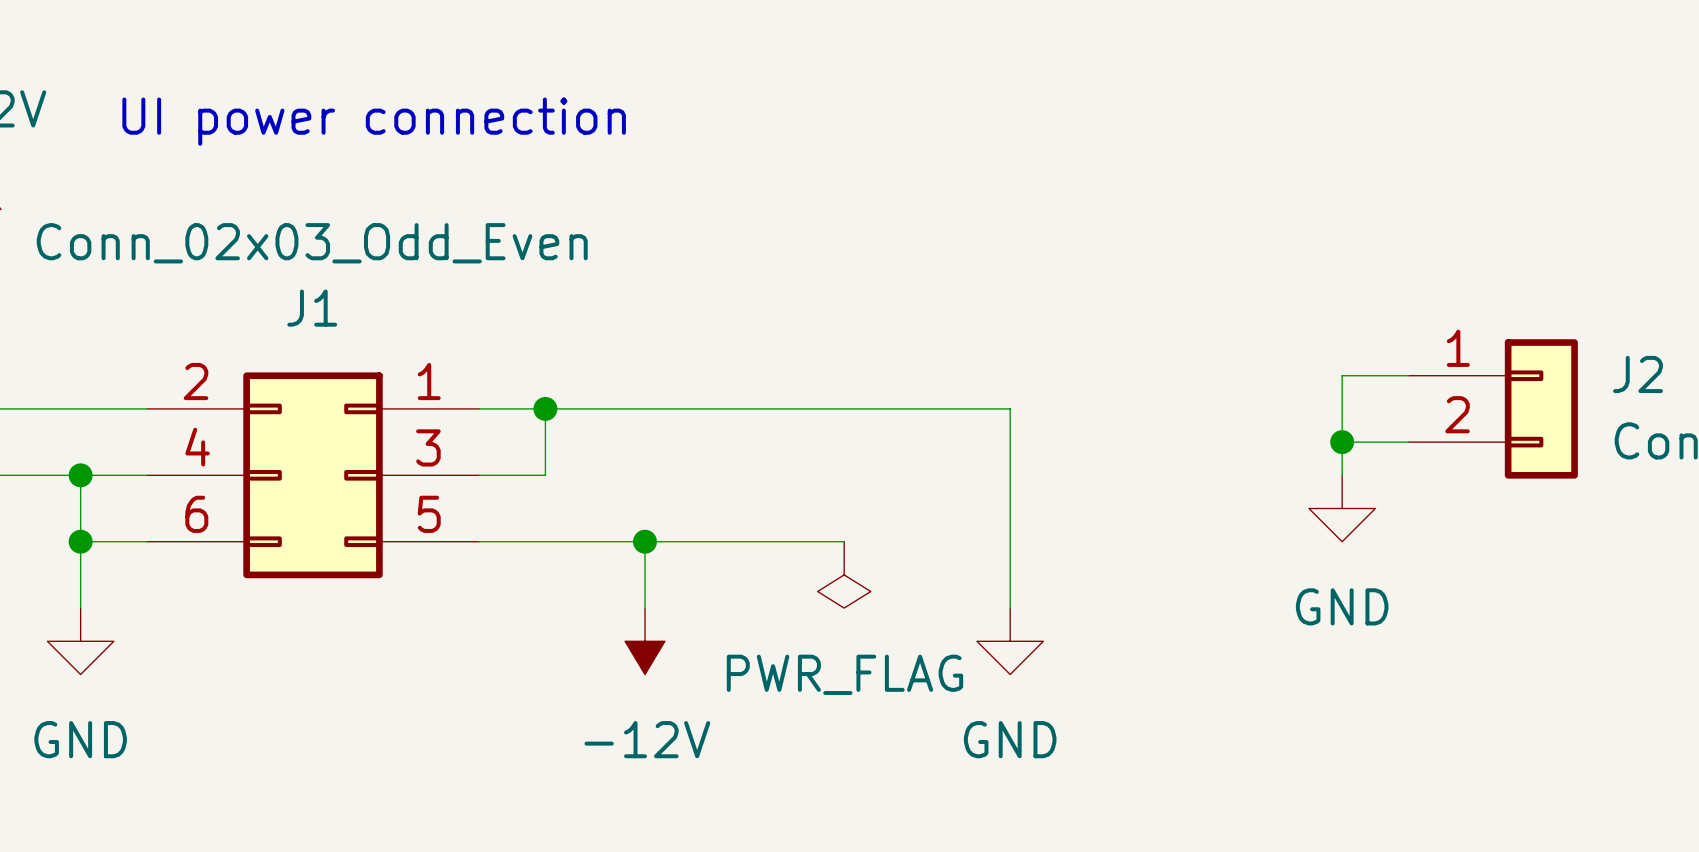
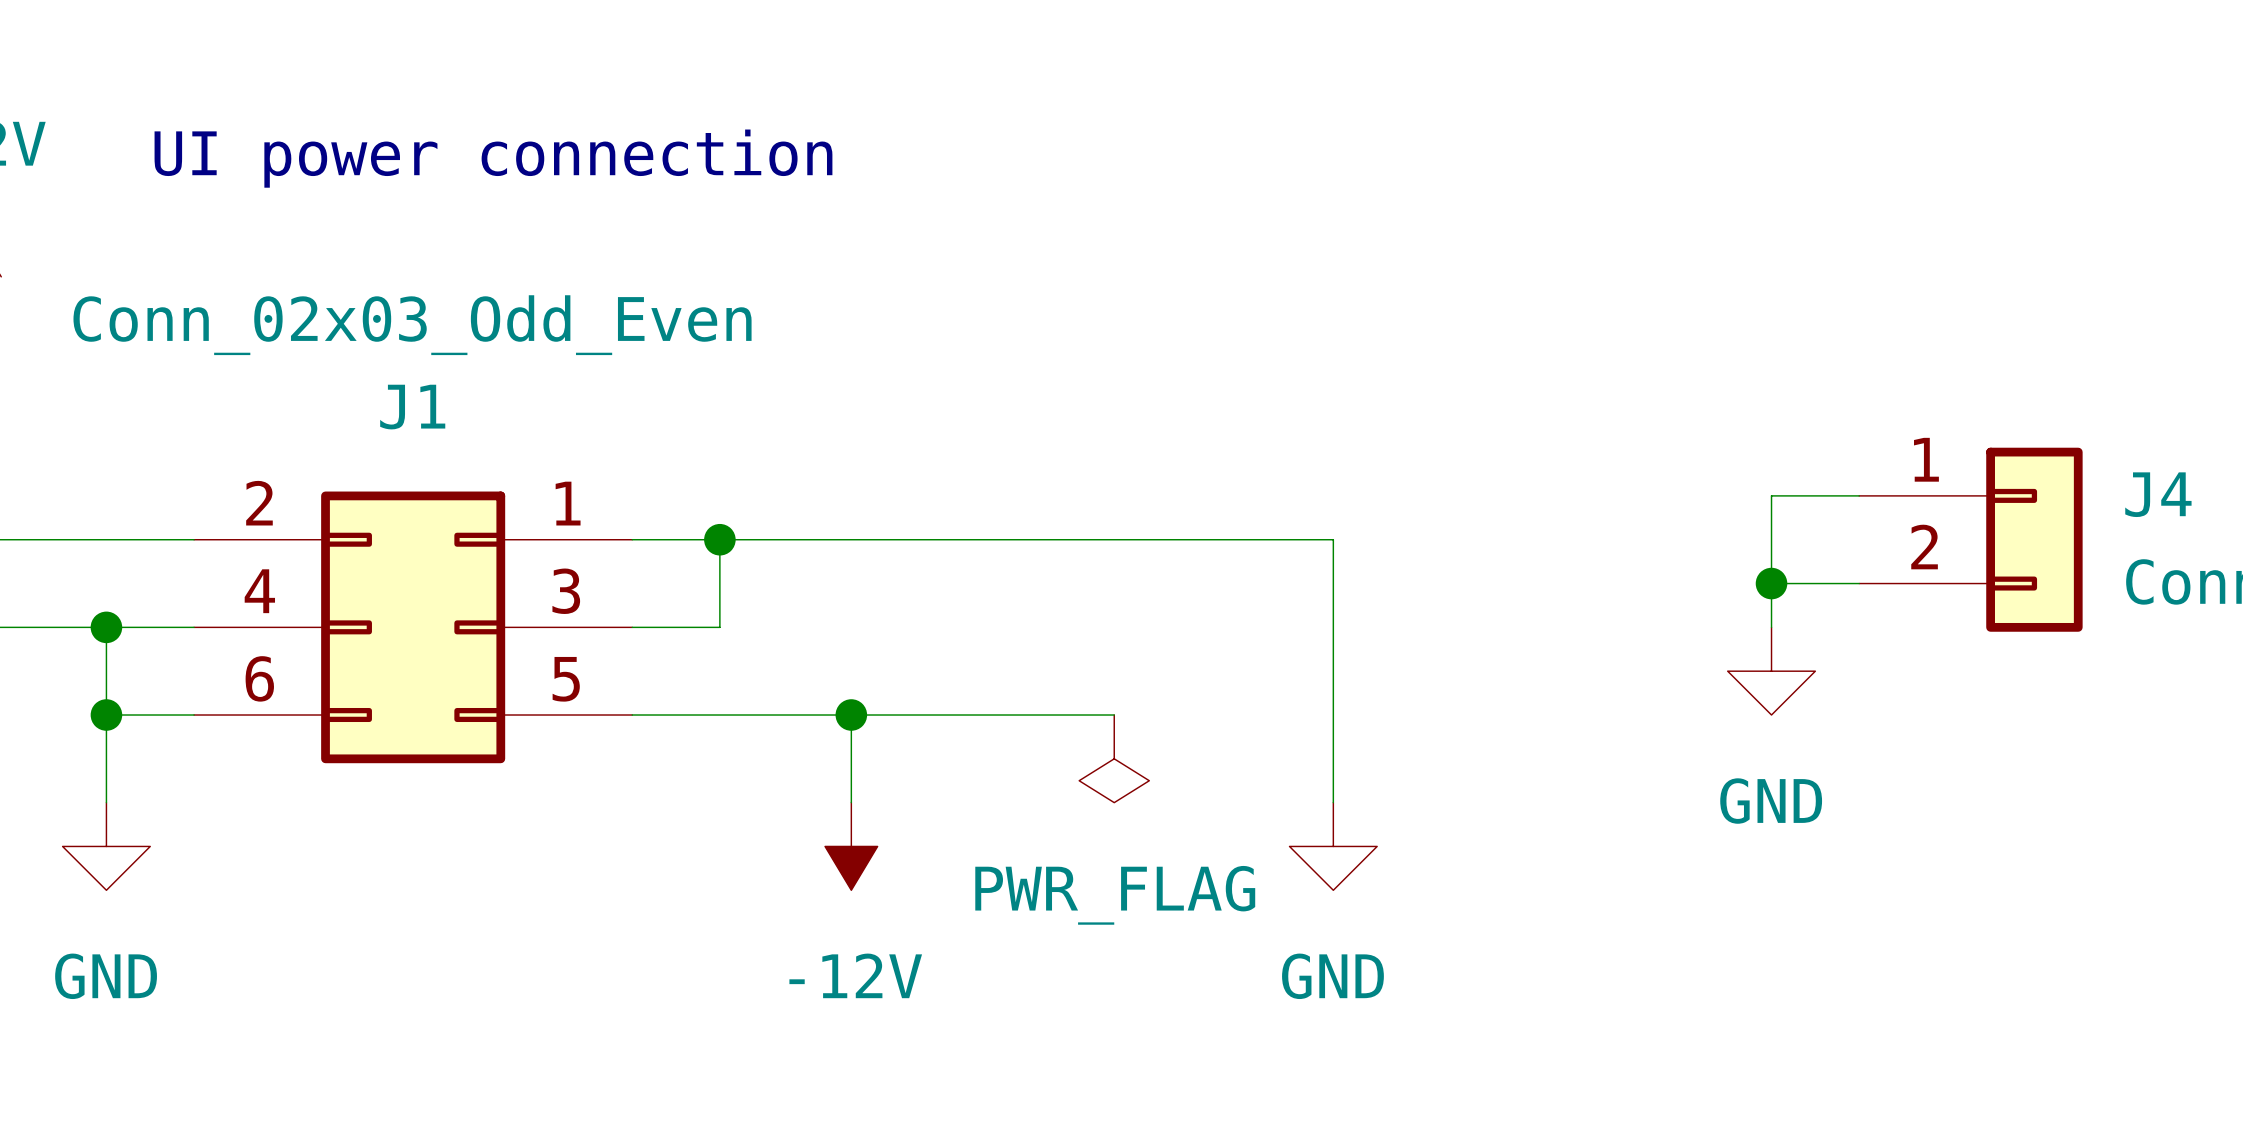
J2 name: J2 (1638, 374) -> J4 (2158, 494)

